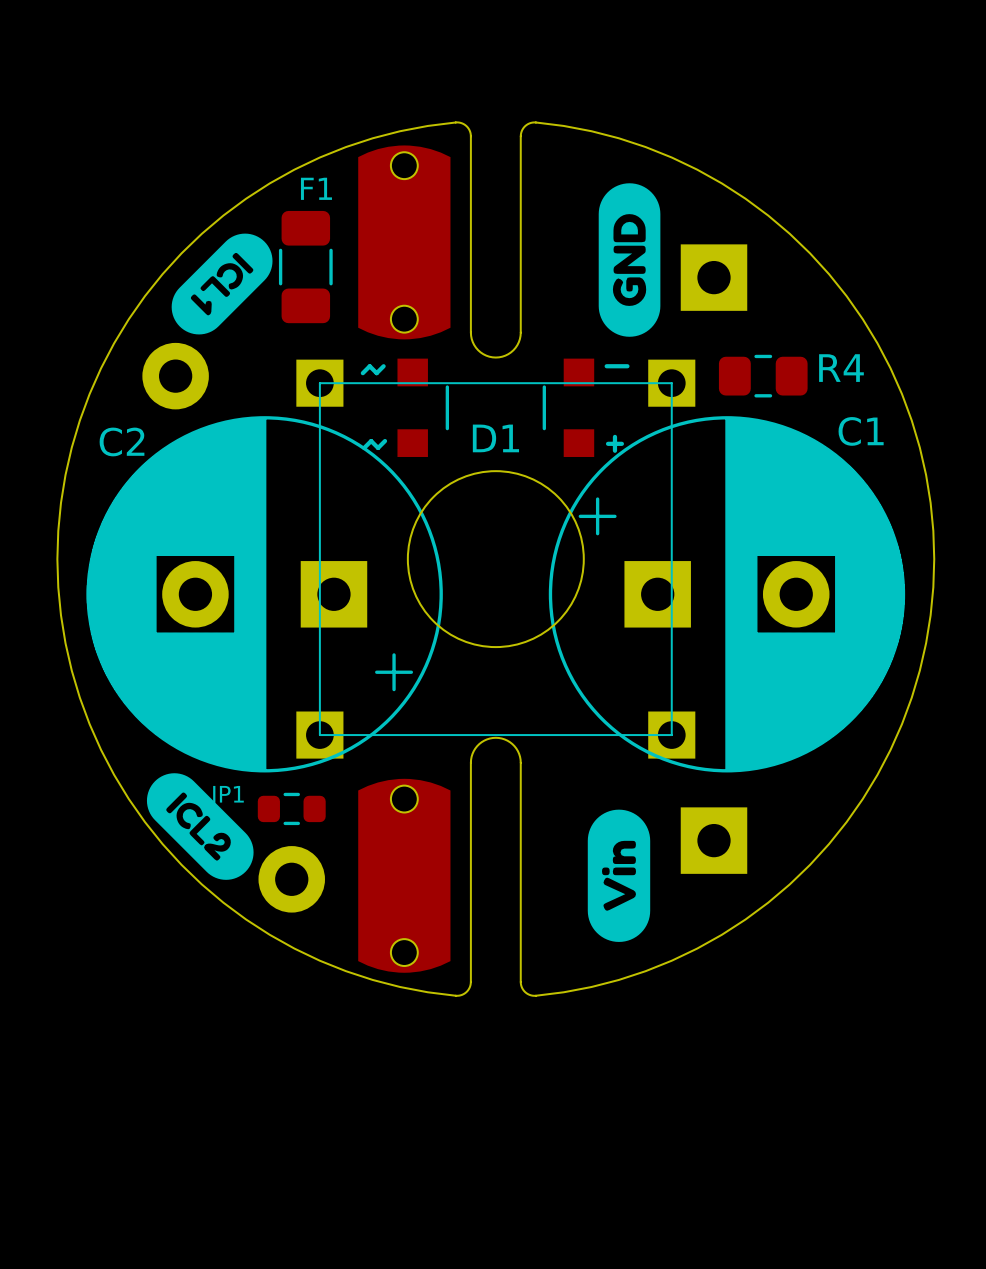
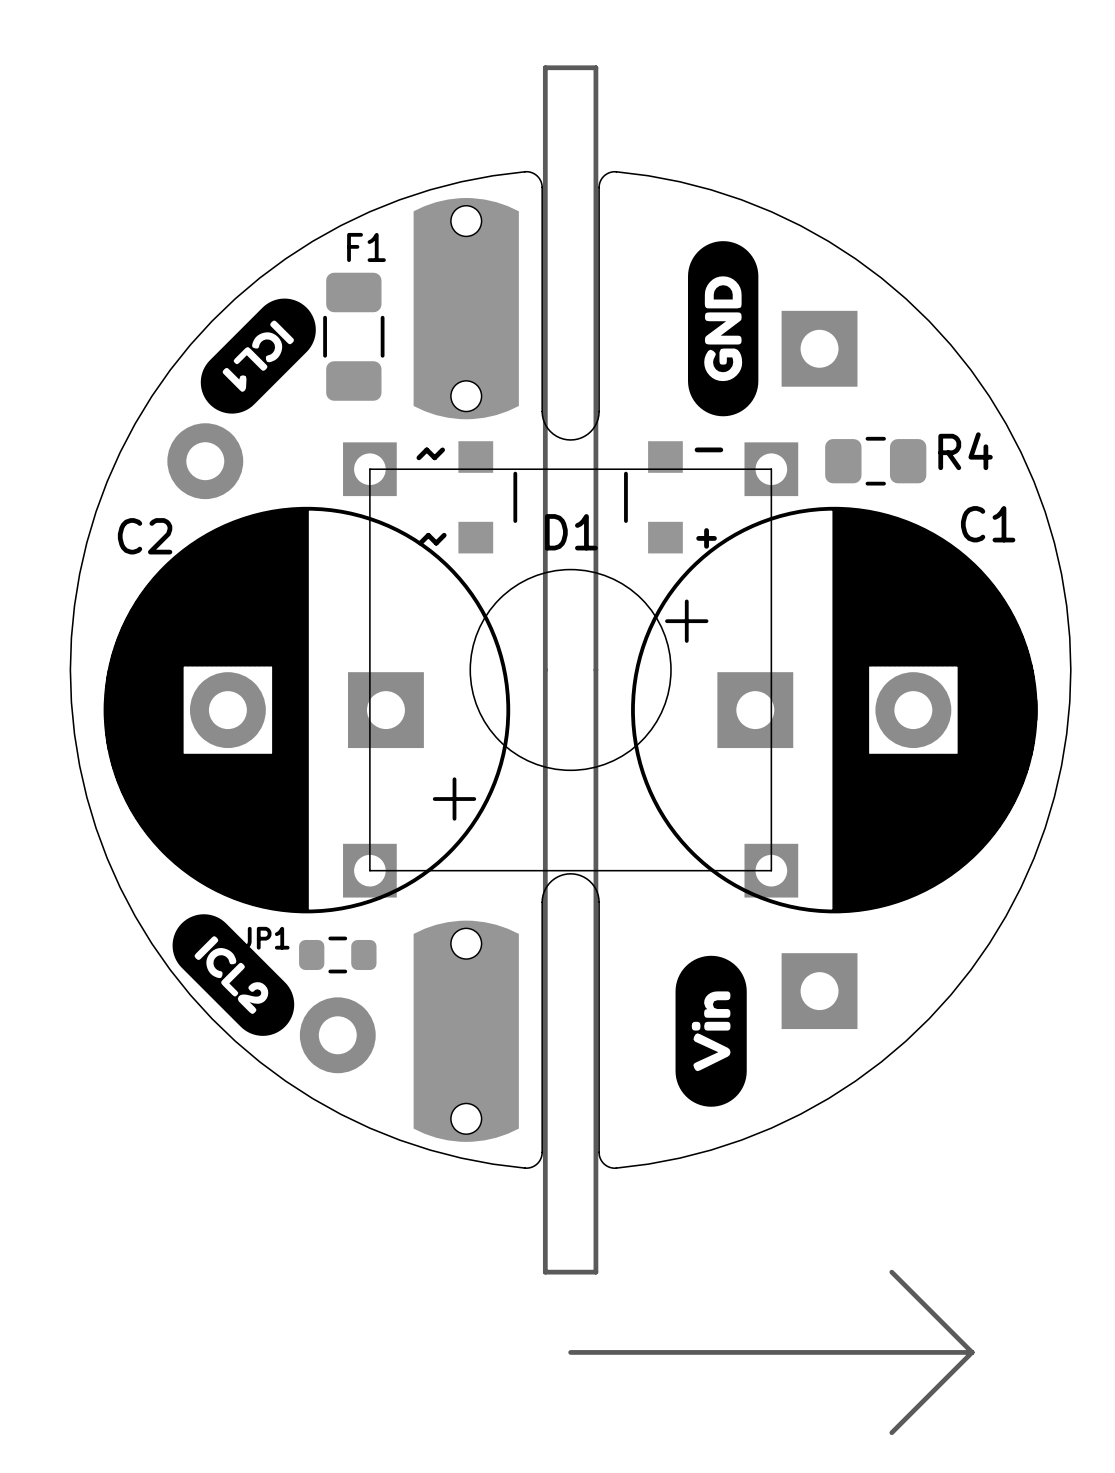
line: none -> (545, 67) (545, 1272) (595, 1272) (595, 67) (545, 67)
line: none -> (891, 1272) (972, 1352)
line: none -> (570, 1352) (972, 1352)
line: none -> (972, 1352) (891, 1432)

